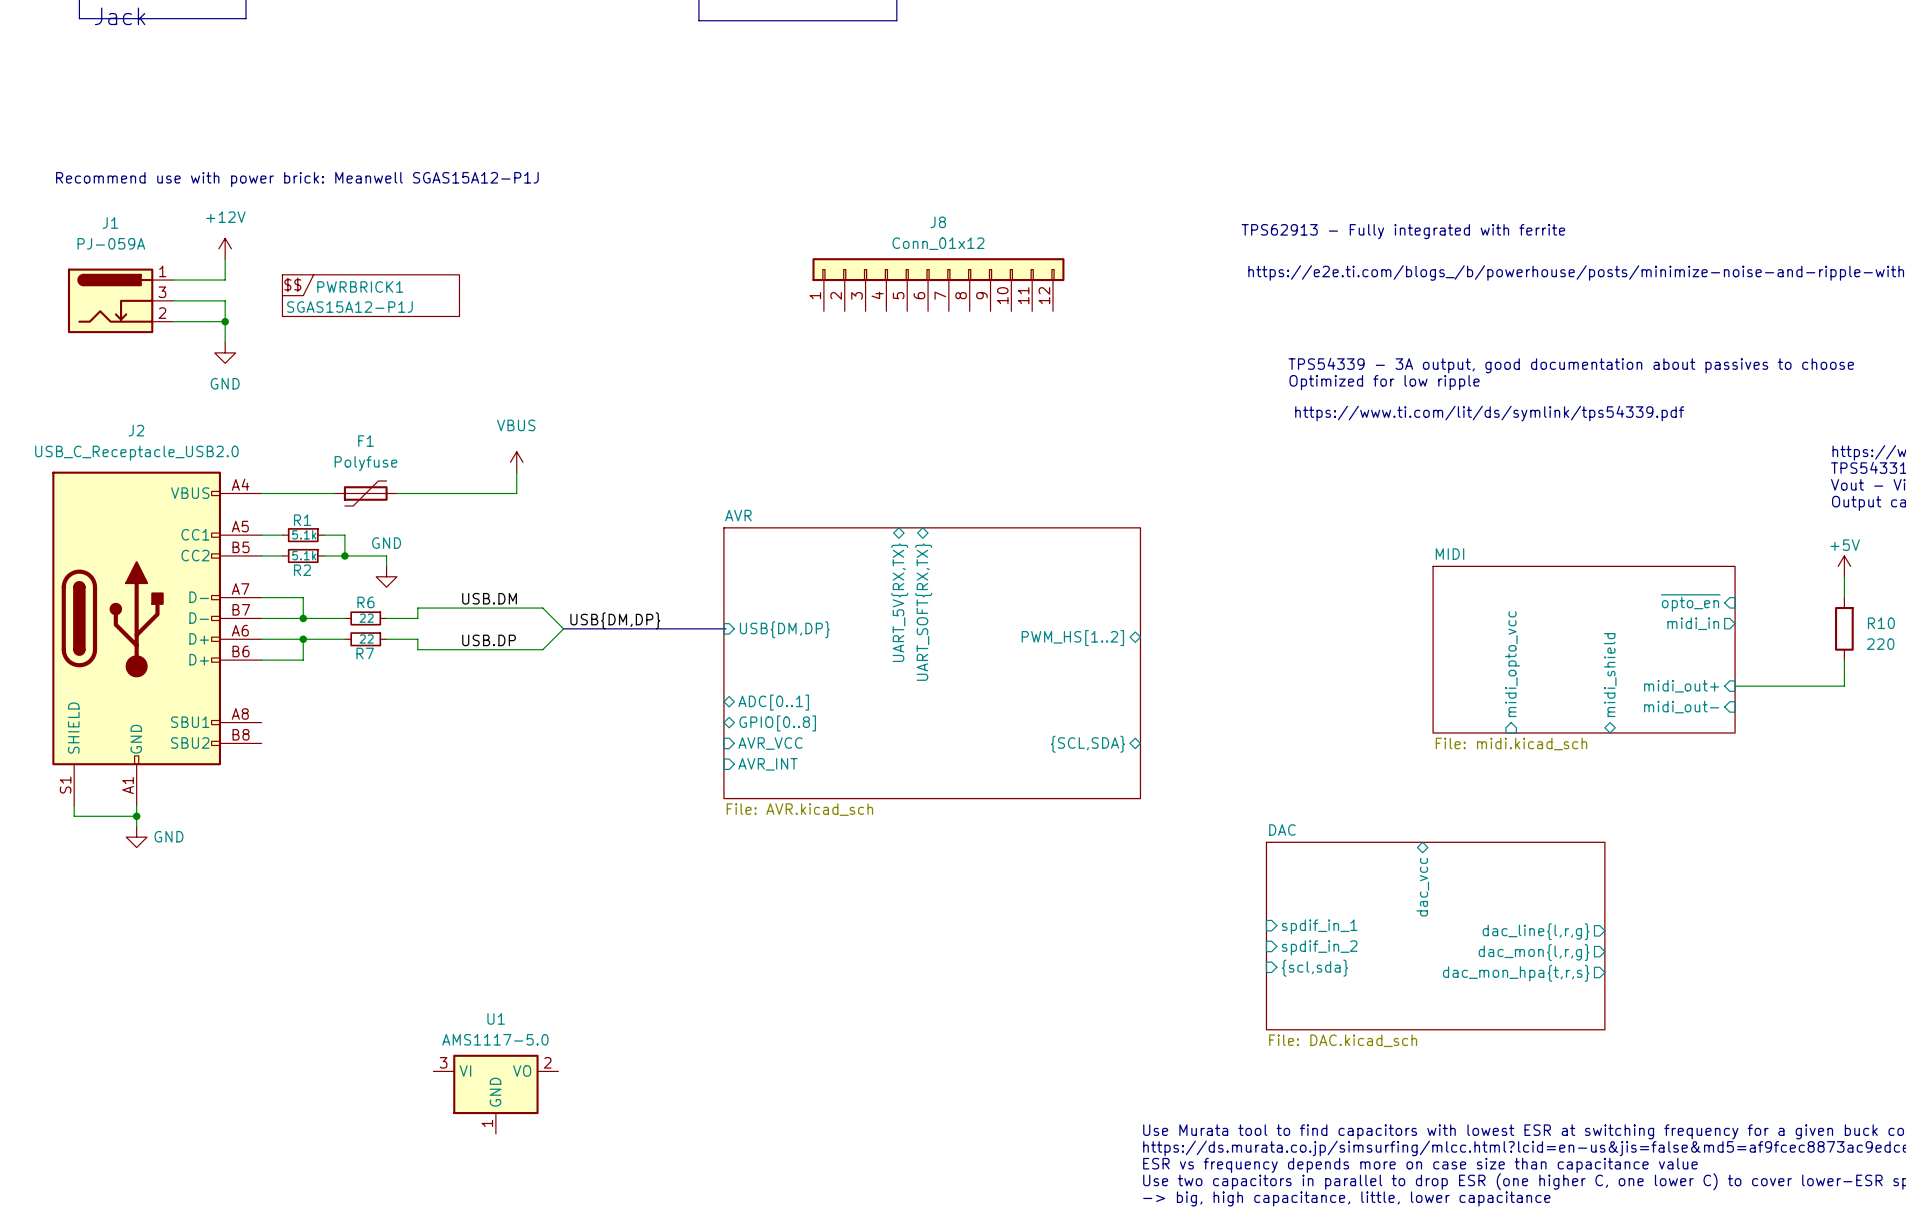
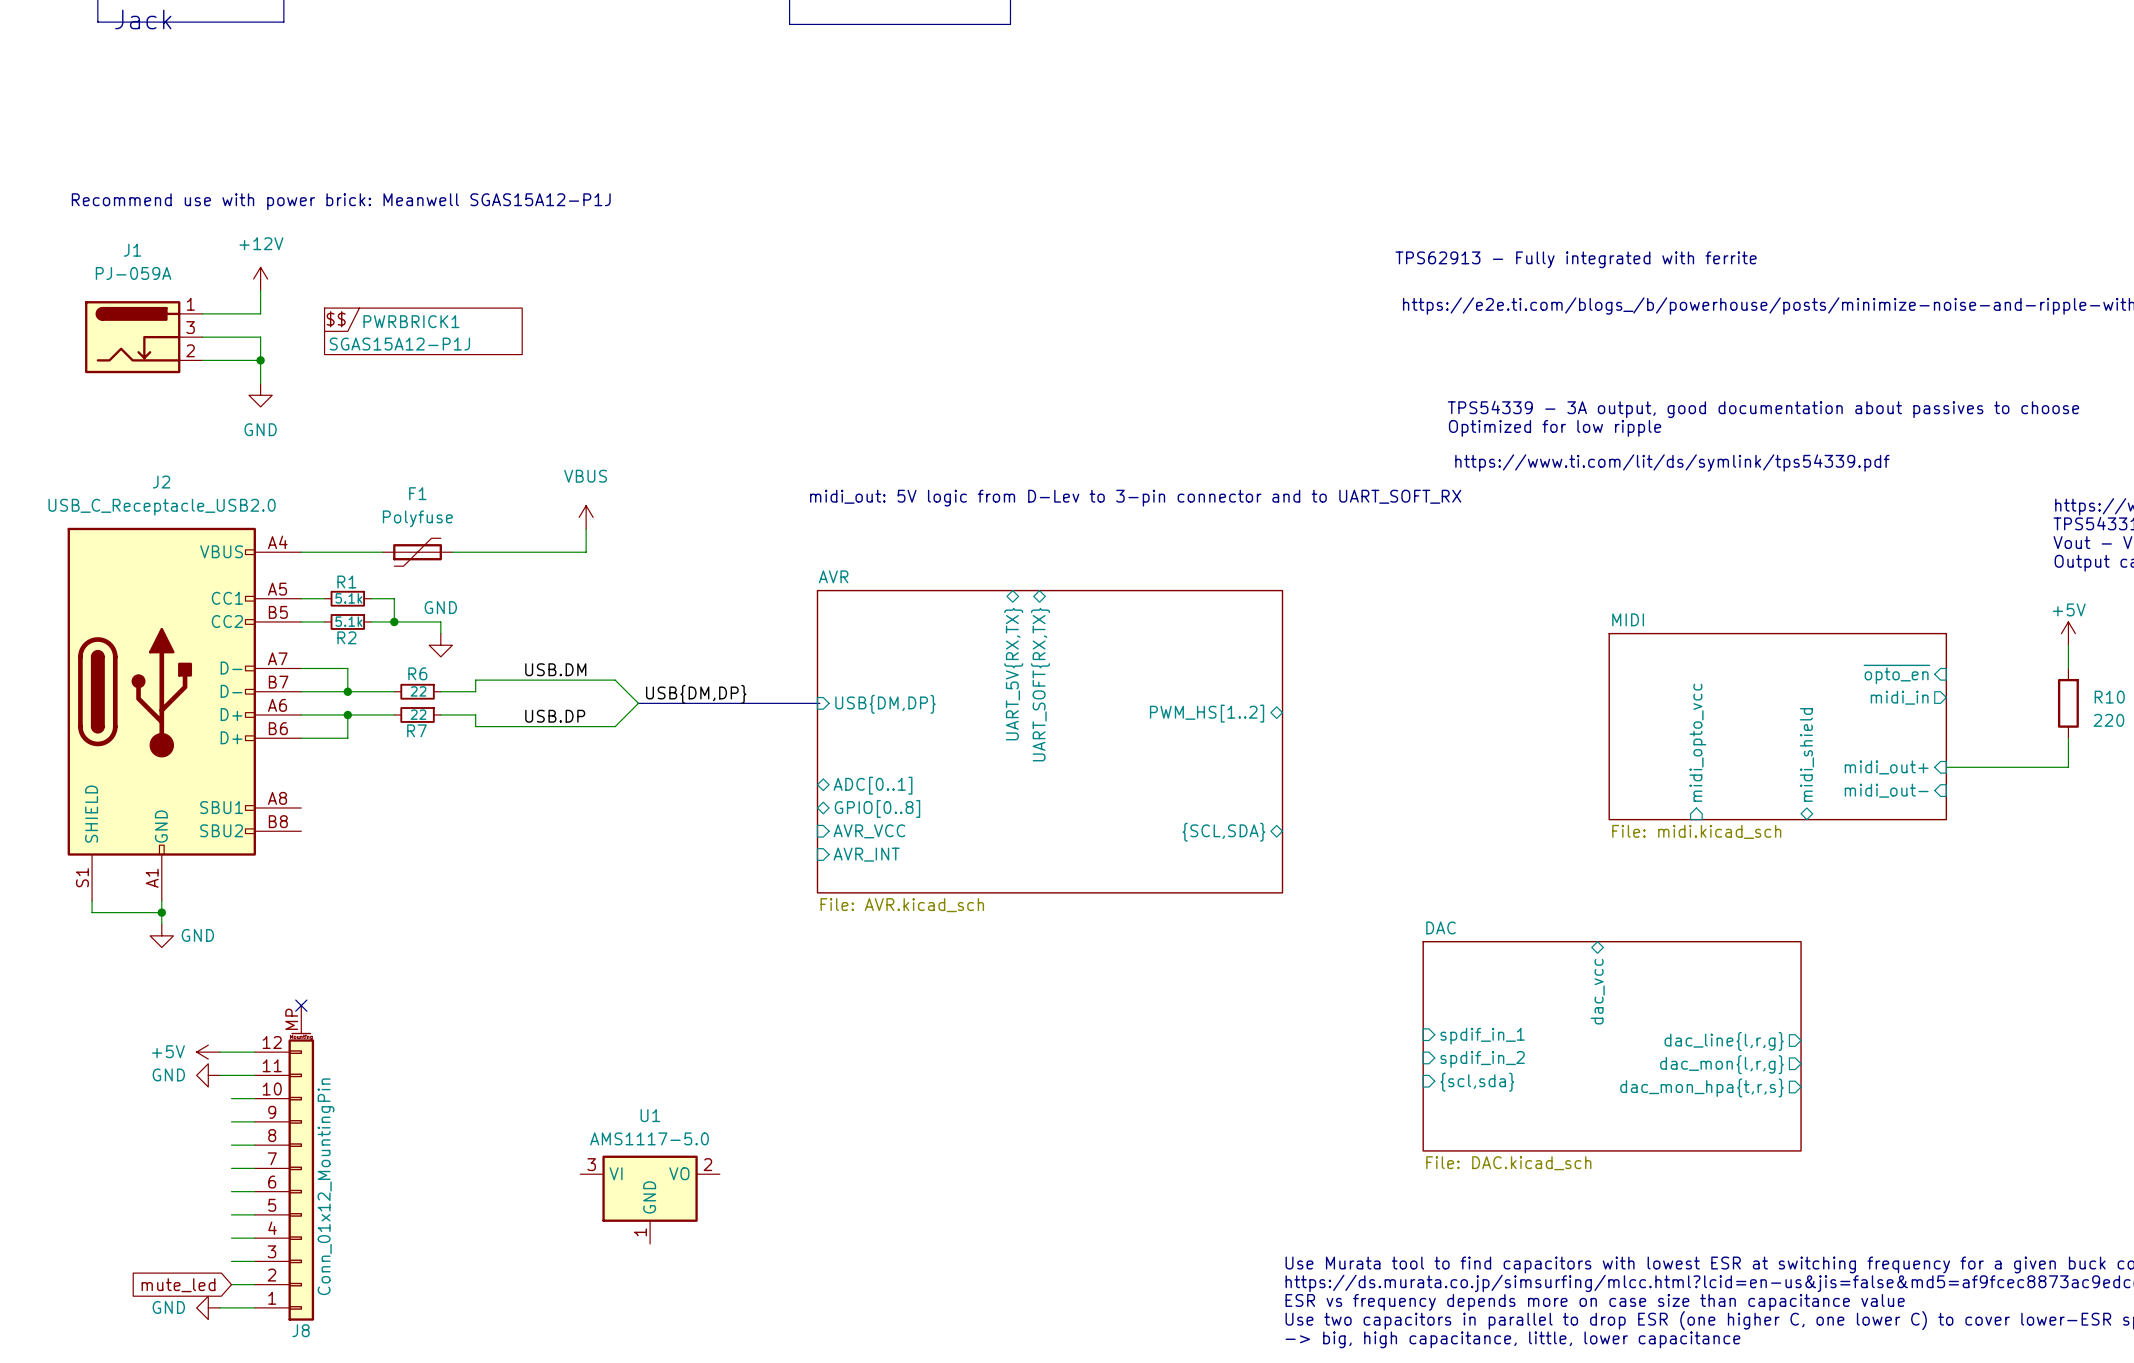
J8 name position: J8 (938, 222) -> J8 (301, 1330)
J8 value: Conn_01x12 (938, 243) -> Conn_01x12_MountingPin (326, 1186)
J8 symbol: [812, 258, 1065, 312] -> [254, 1005, 315, 1321]
text: none -> midi_out: 5V logic from D-Lev to 3-pin connector and to UART_SOFT_RX (1135, 498)
no-connect mark: none -> (301, 1005)
power symbol: none -> +5V (208, 1052)
wire: none -> (219, 1052) (254, 1052)
power symbol: none -> GND (208, 1075)
wire: none -> (219, 1075) (254, 1075)
wire: none -> (231, 1098) (254, 1098)
wire: none -> (231, 1121) (254, 1121)
wire: none -> (231, 1145) (254, 1145)
wire: none -> (231, 1168) (254, 1168)
wire: none -> (231, 1191) (254, 1191)
wire: none -> (231, 1214) (254, 1214)
U1 position: (495, 1094) -> (650, 1199)
wire: none -> (231, 1238) (254, 1238)
wire: none -> (231, 1261) (254, 1261)
wire: none -> (231, 1284) (254, 1284)
global label: none -> mute_led (178, 1285)
power symbol: none -> GND (208, 1307)
wire: none -> (219, 1307) (254, 1307)

